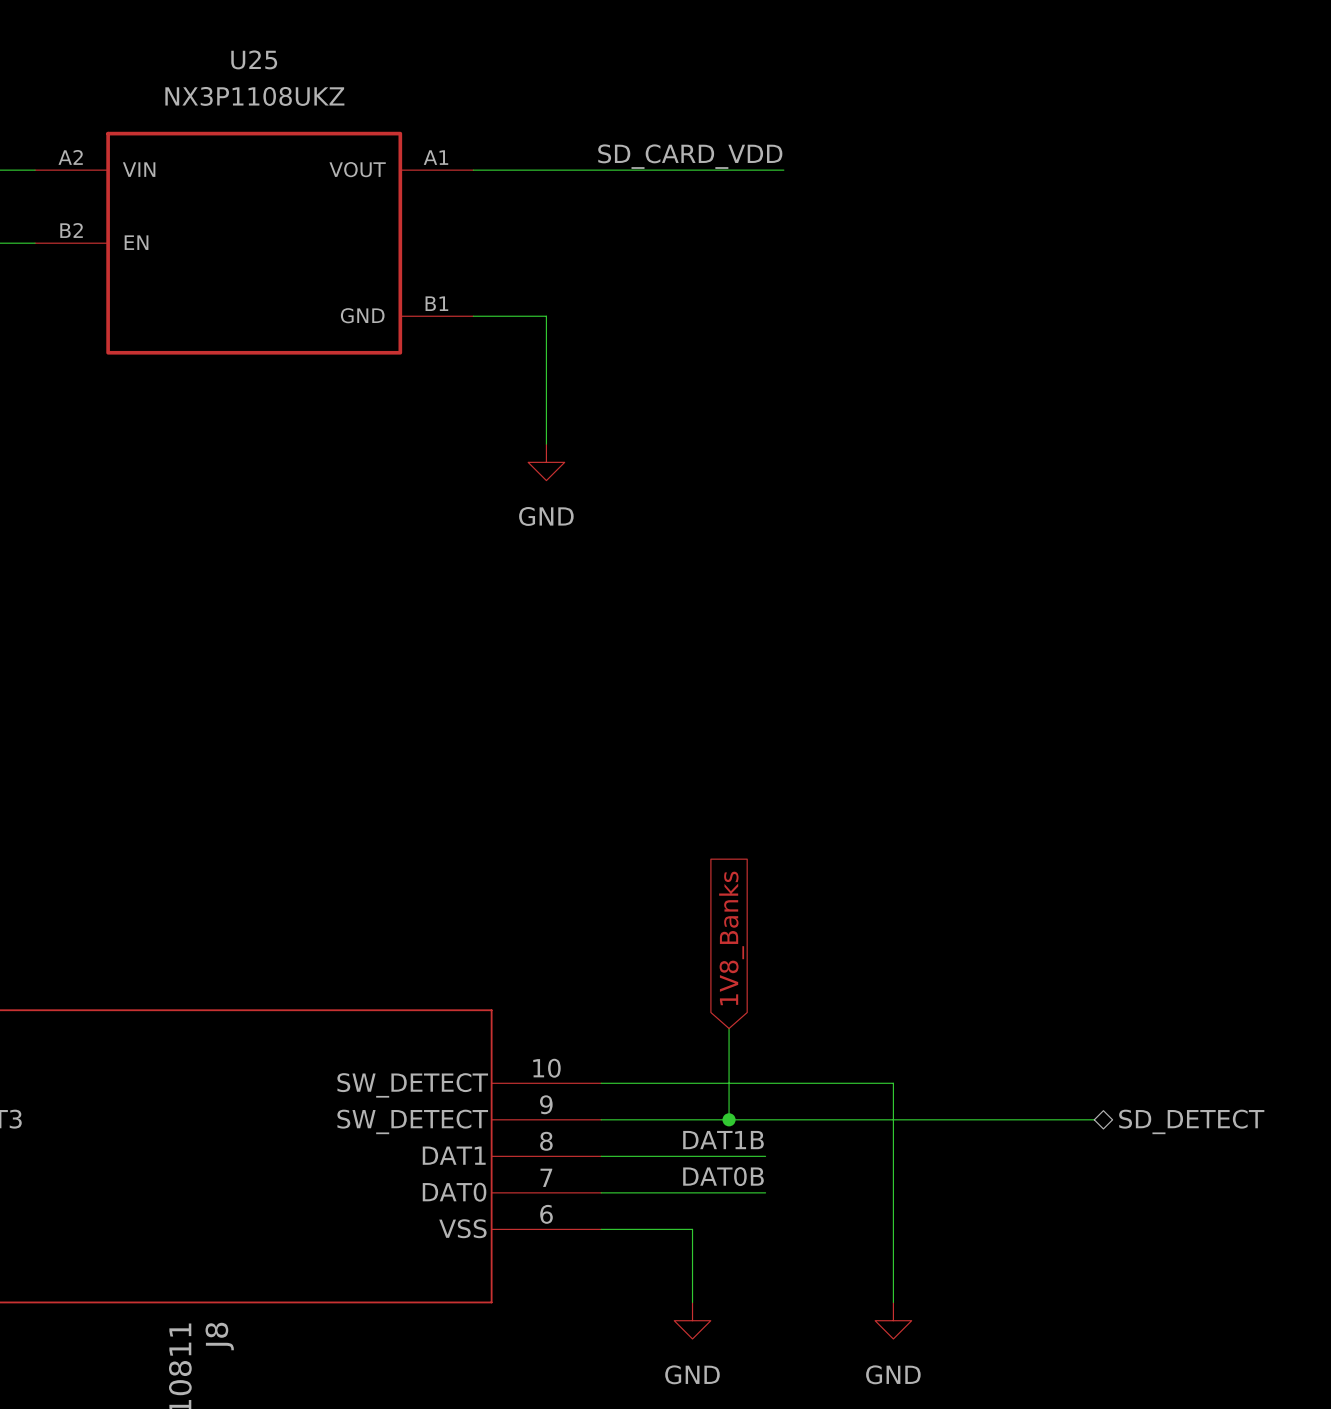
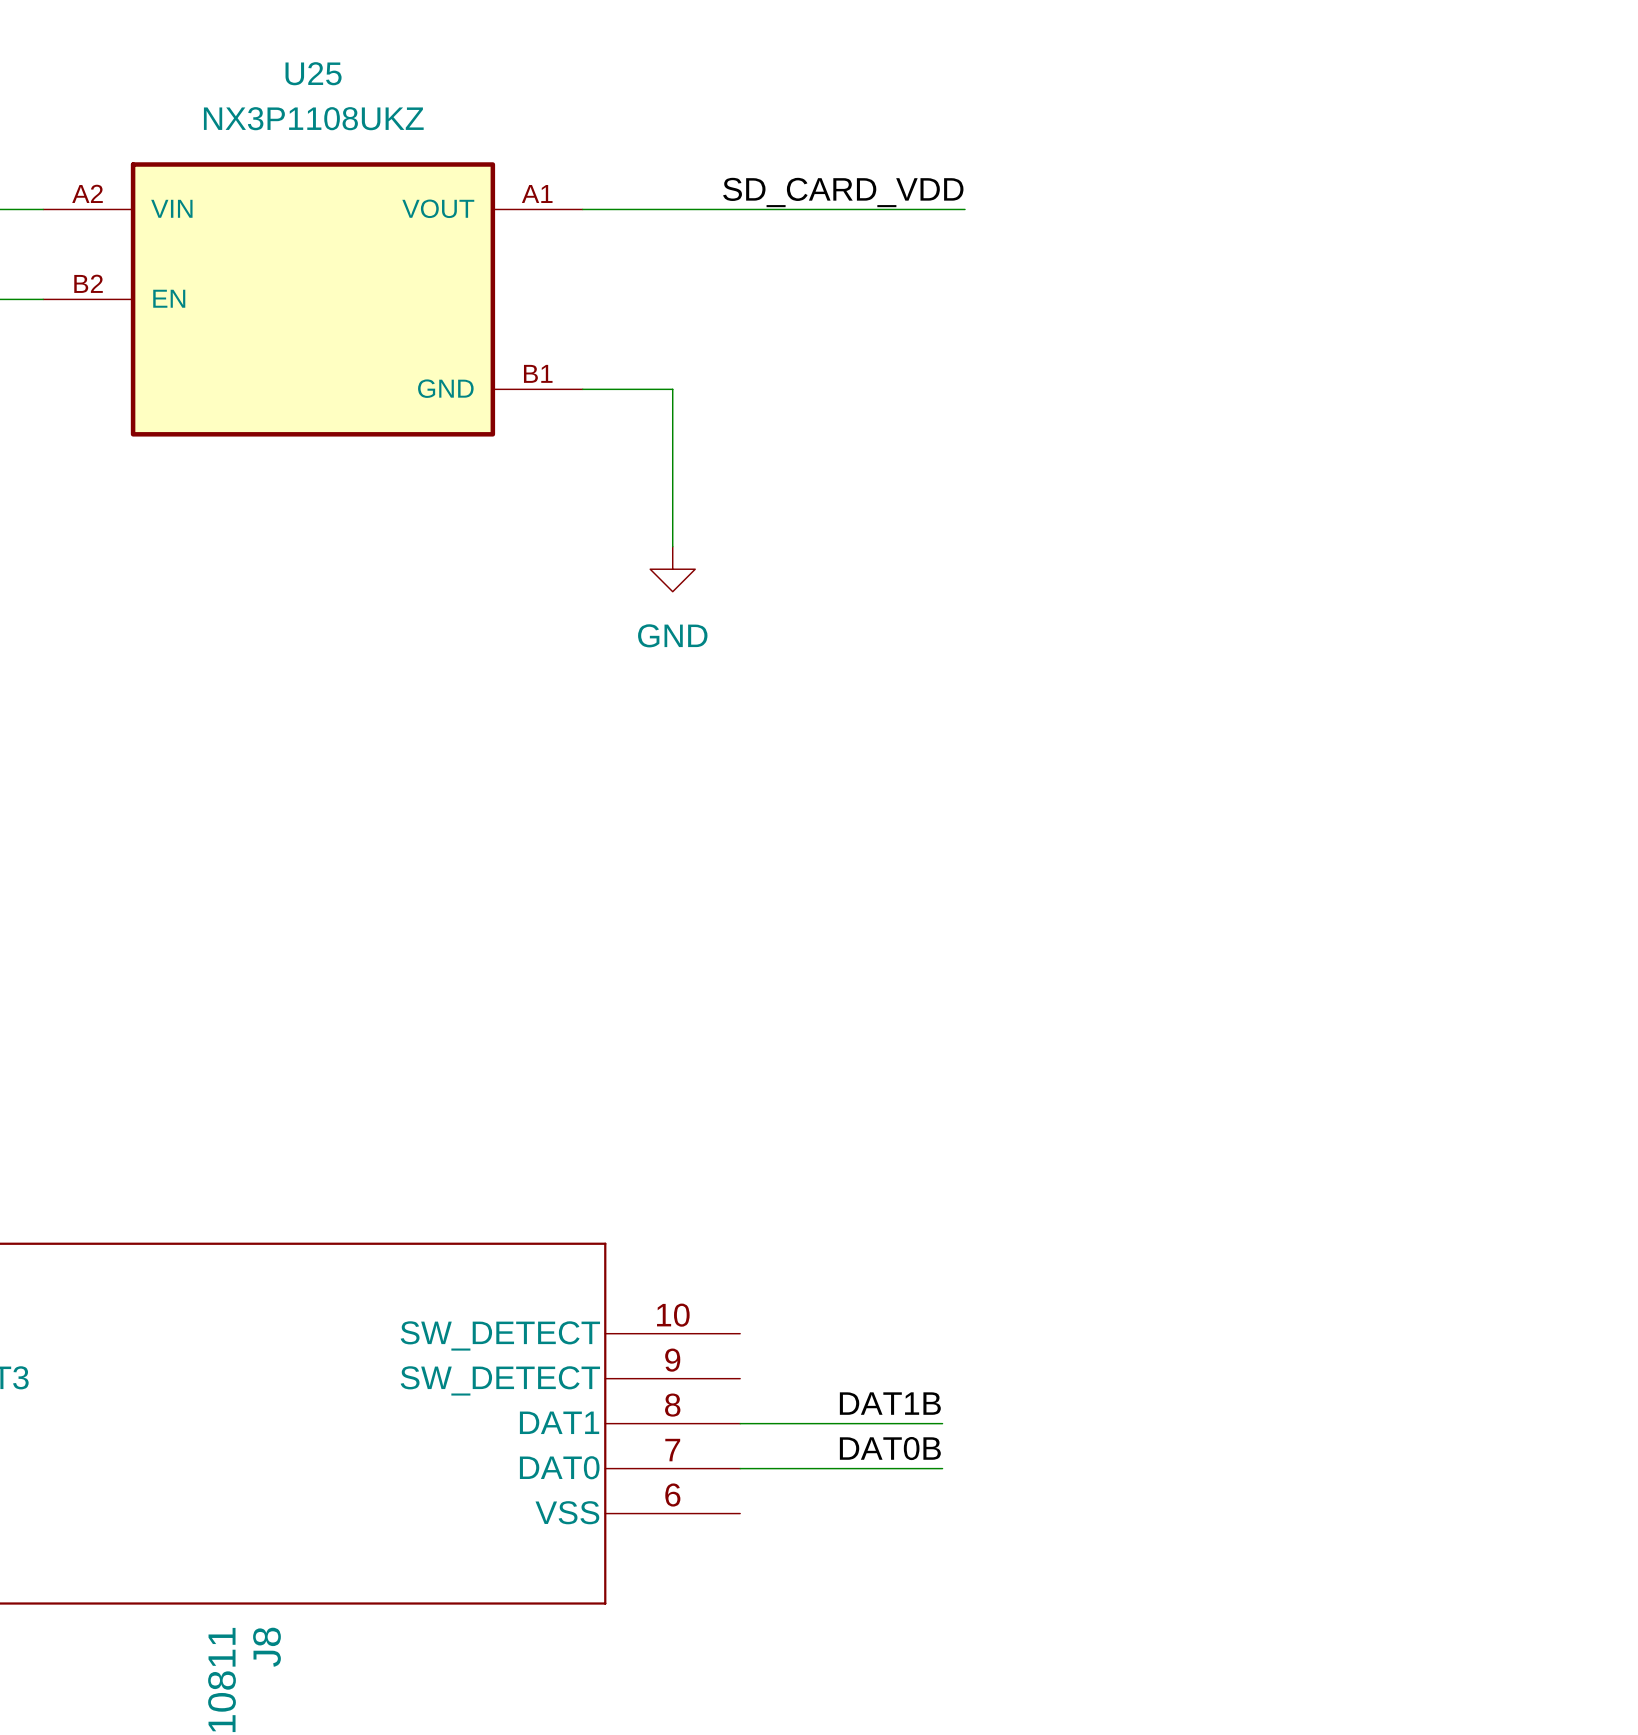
global label: 1V8_Banks (731, 938) -> none
wire: (729, 1028) (729, 1119) -> none
wire: (601, 1083) (893, 1083) (893, 1302) -> none
wire: (601, 1119) (1094, 1119) -> none
junction: (729, 1119) -> none
hierarchical label: SD_DETECT (1191, 1121) -> none
wire: (601, 1229) (692, 1229) (692, 1302) -> none
power symbol: GND (692, 1320) -> none
power symbol: GND (893, 1320) -> none

